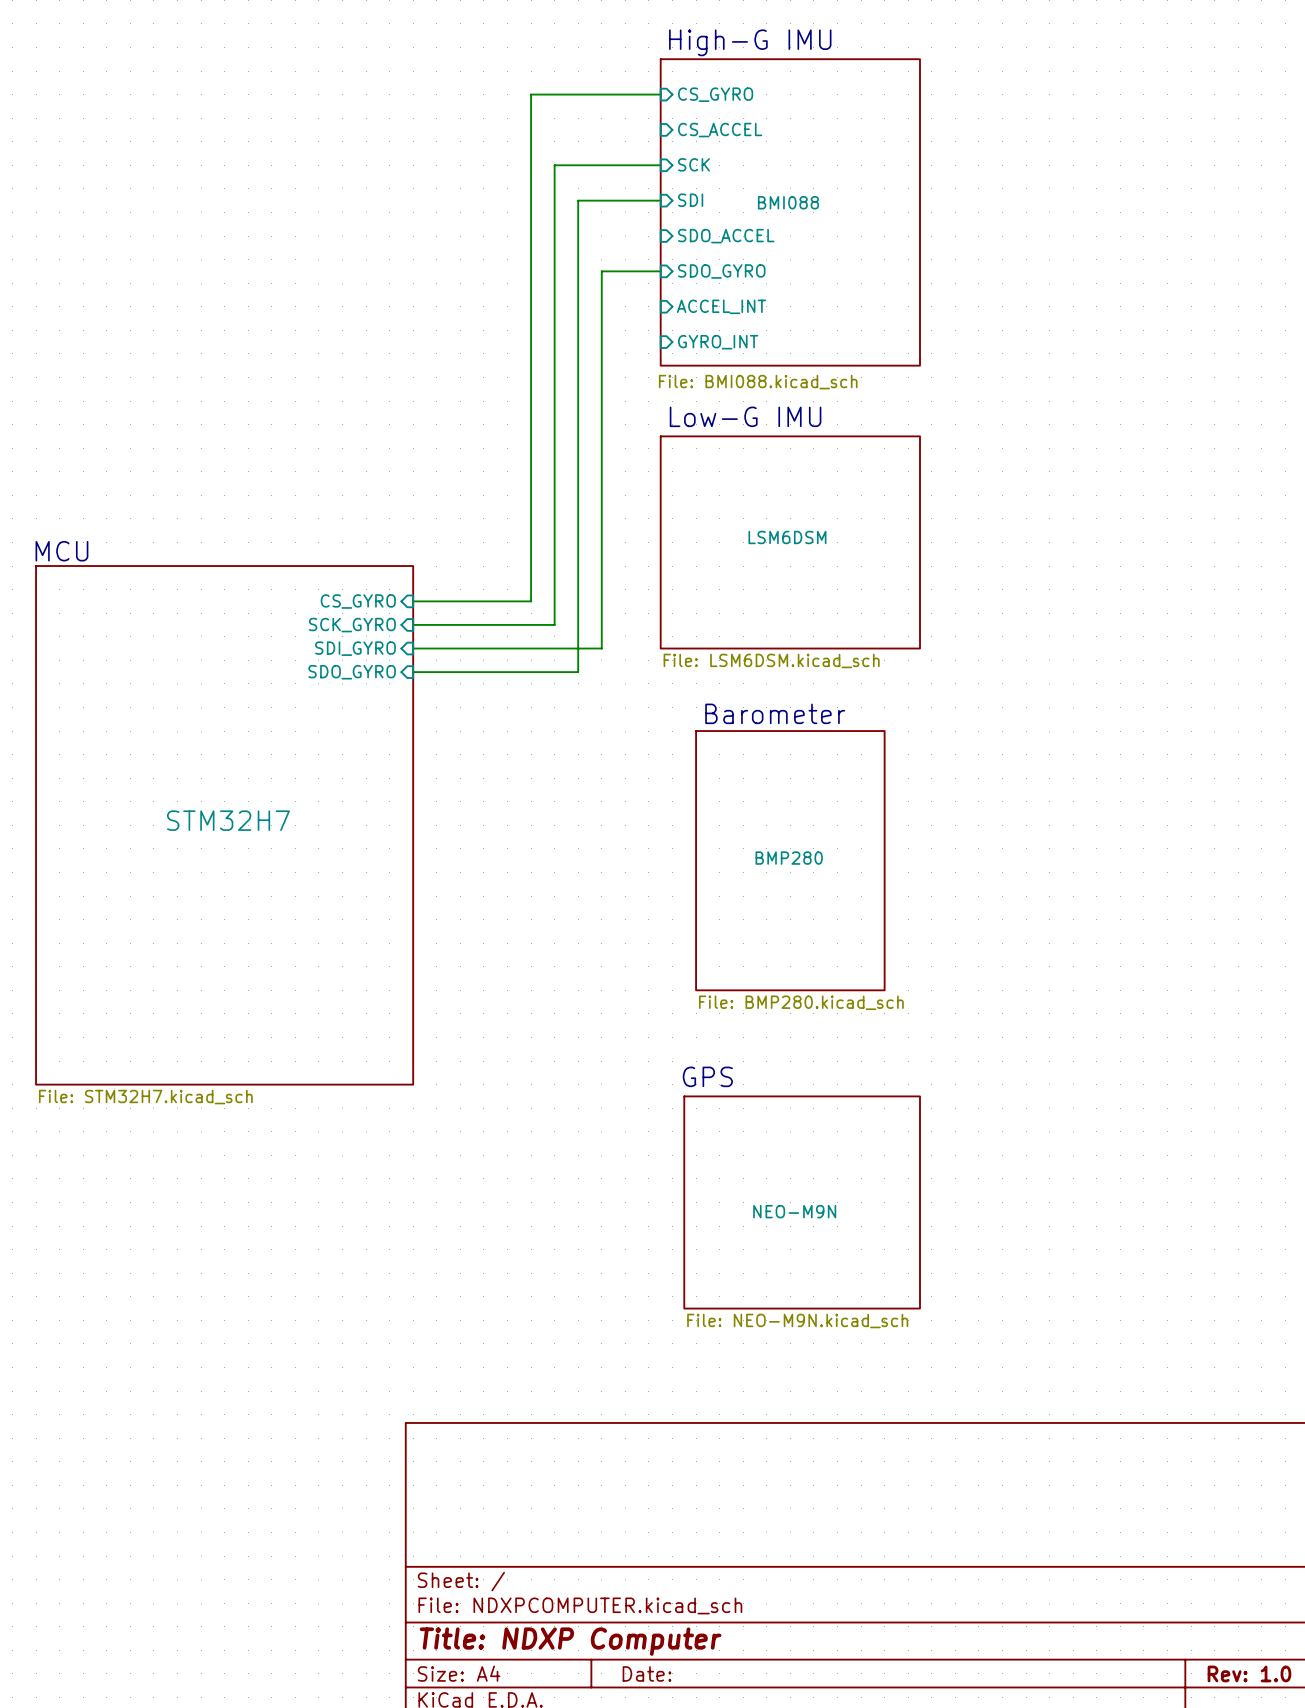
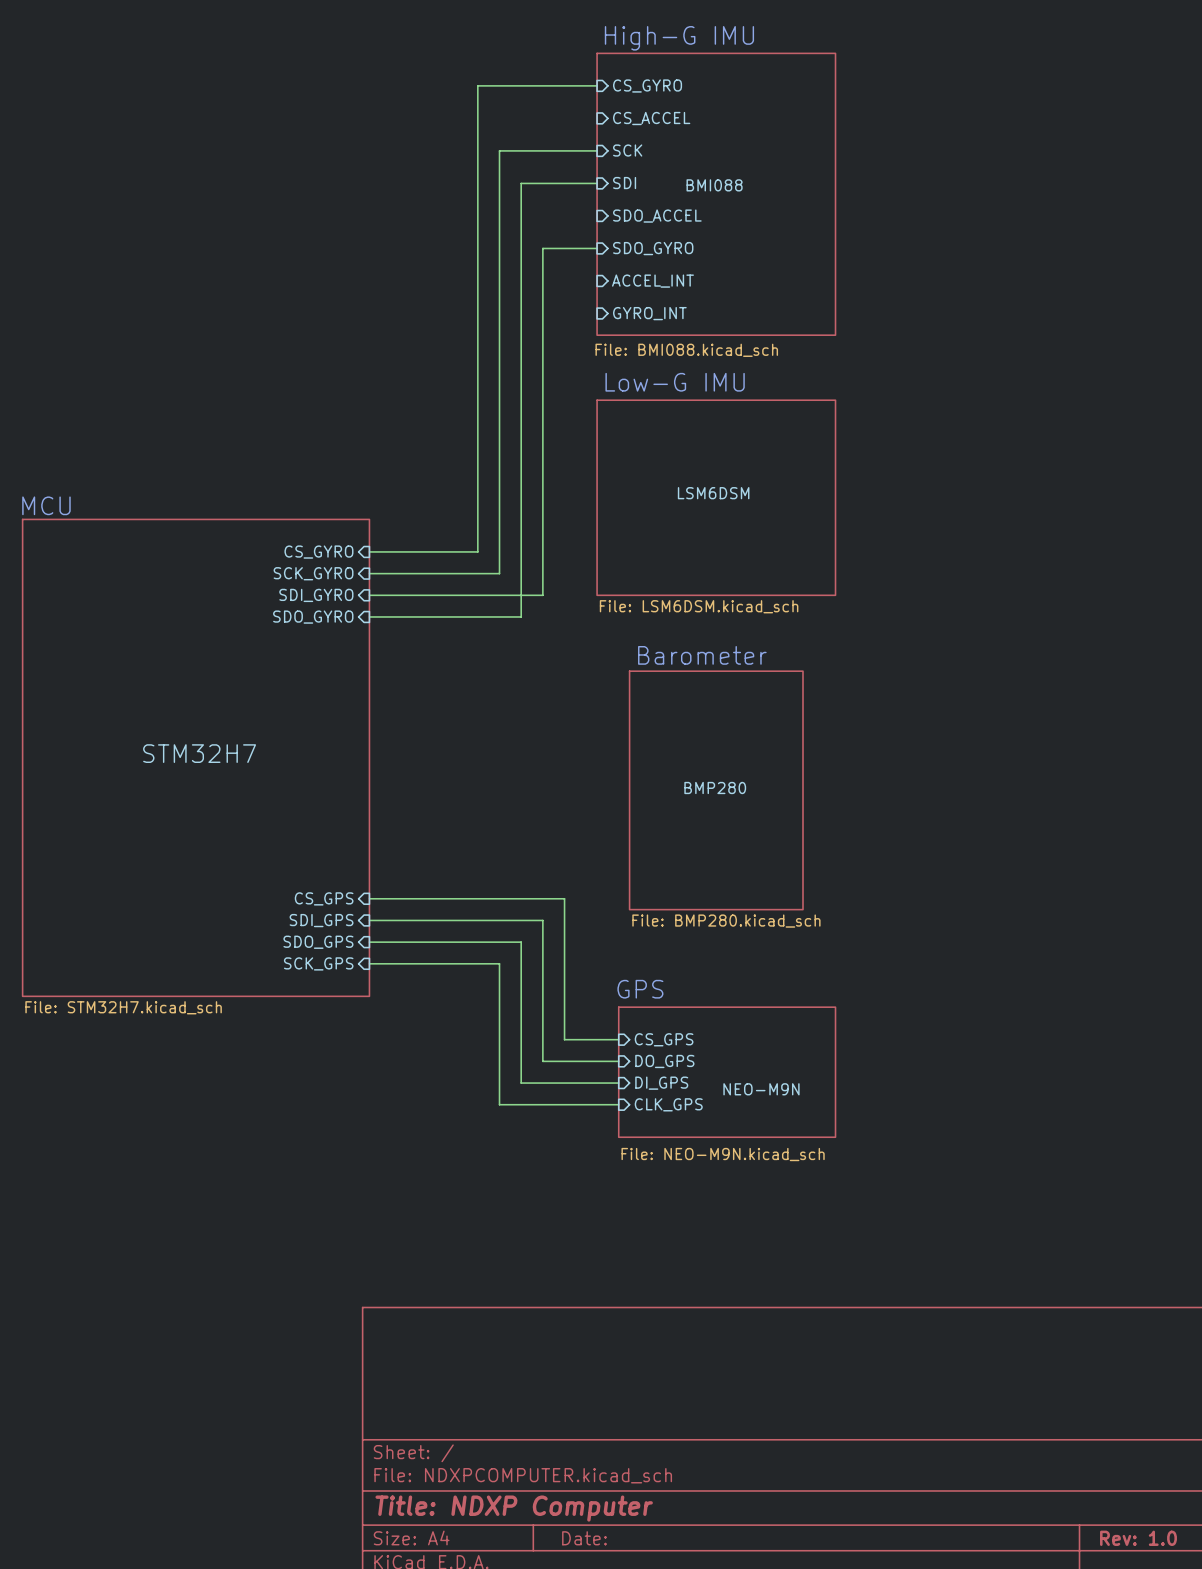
sheet pin: none -> CS_GPS (324, 898)
wire: none -> (369, 898) (564, 898) (564, 1039) (618, 1039)
sheet pin: none -> SDI_GPS (321, 920)
wire: none -> (369, 920) (542, 920) (542, 1061) (618, 1061)
sheet pin: none -> SDO_GPS (318, 942)
wire: none -> (369, 942) (521, 942) (521, 1083) (618, 1083)
sheet pin: none -> SCK_GPS (318, 963)
wire: none -> (369, 963) (499, 963) (499, 1104) (618, 1104)
sheet NEO-M9N shape: [683, 1095, 921, 1310] -> [618, 1006, 837, 1138]
sheet pin: none -> CS_GPS (664, 1039)
sheet pin: none -> DO_GPS (664, 1061)
sheet pin: none -> DI_GPS (661, 1083)
sheet pin: none -> CLK_GPS (668, 1104)
sheet NEO-M9N name position: NEO-M9N (794, 1211) -> NEO-M9N (761, 1089)
sheet NEO-M9N value position: File: NEO-M9N.kicad_sch (797, 1320) -> File: NEO-M9N.kicad_sch (723, 1154)

